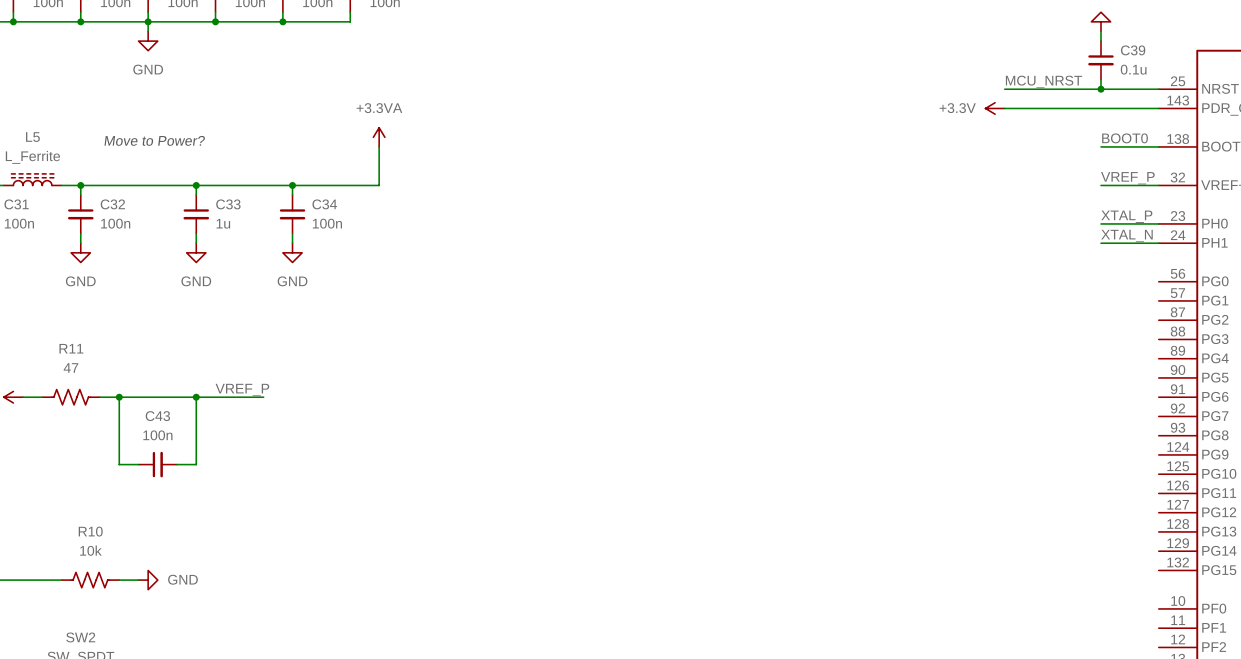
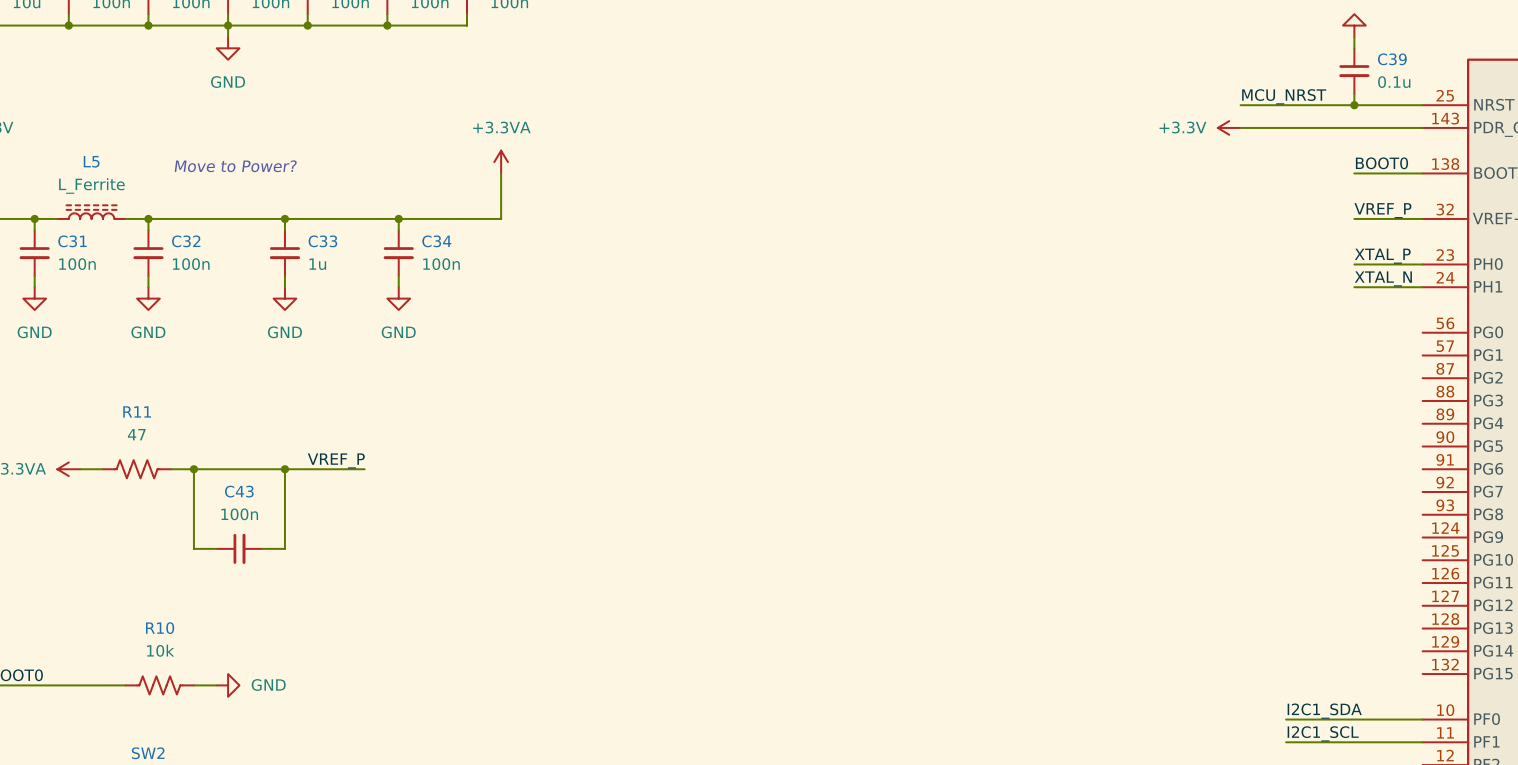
label: none -> I2C1_SDA (1324, 711)
wire: none -> (1286, 719) (1422, 719)
label: none -> I2C1_SCL (1323, 733)
wire: none -> (1286, 742) (1422, 742)

